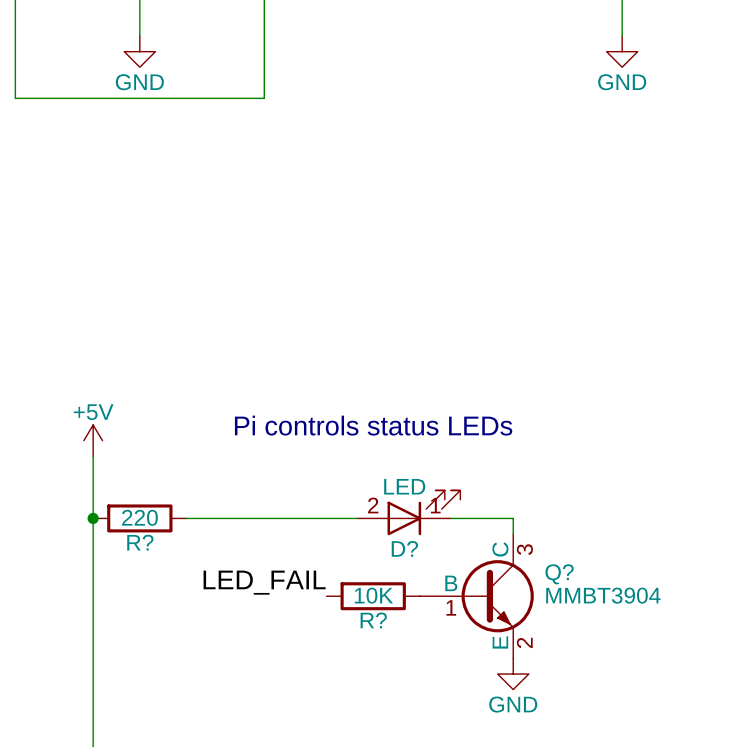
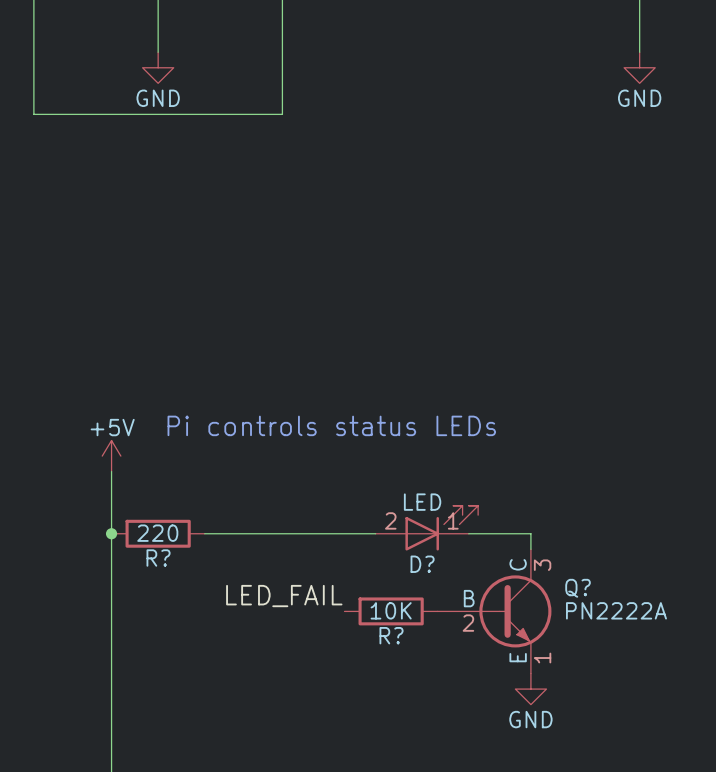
text position: Pi controls status LEDs (373, 425) -> Pi controls status LEDs (331, 425)
Q? symbol: [419, 534, 534, 659] -> [437, 549, 552, 674]
Q? value: MMBT3904 (603, 595) -> PN2222A (616, 610)

